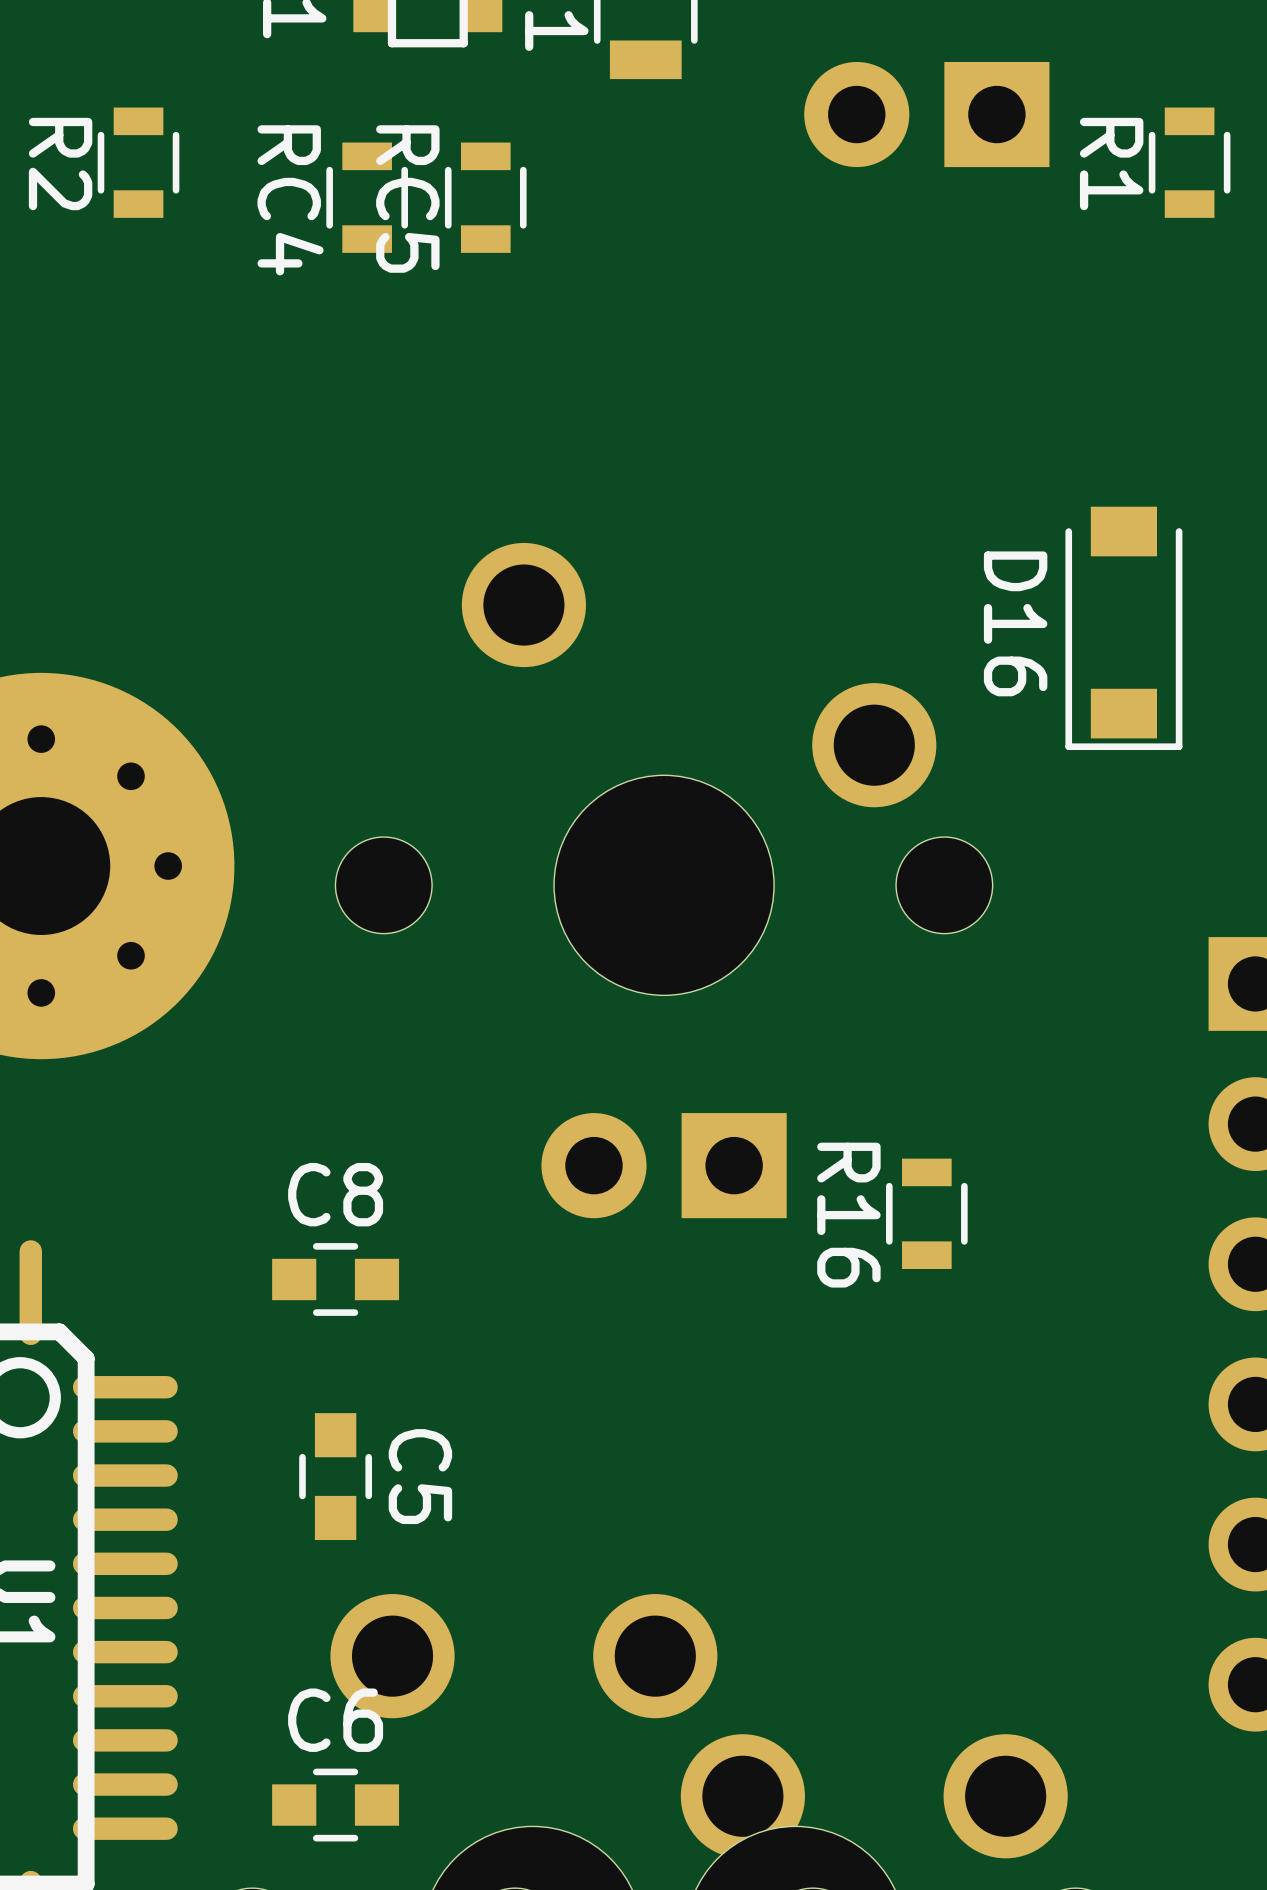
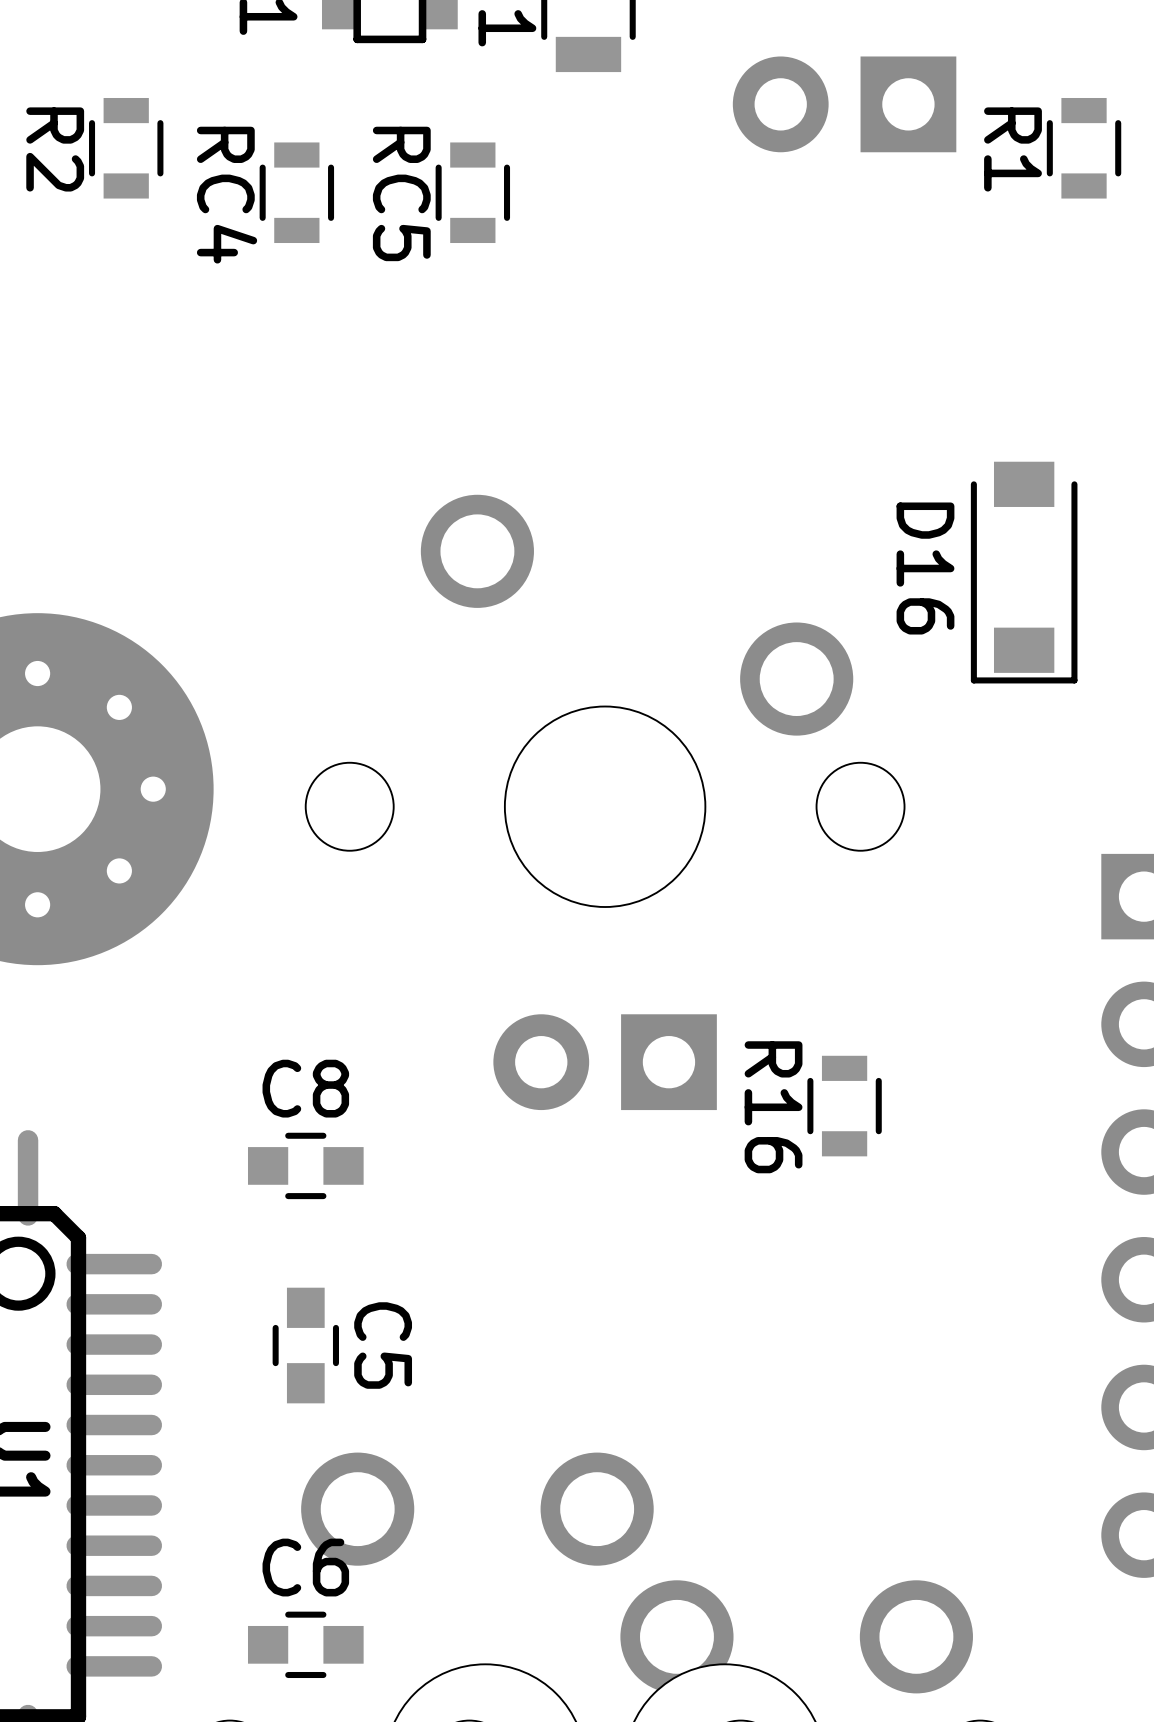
RC4 position: (367, 197) -> (296, 192)
RC5 position: (485, 197) -> (472, 192)

